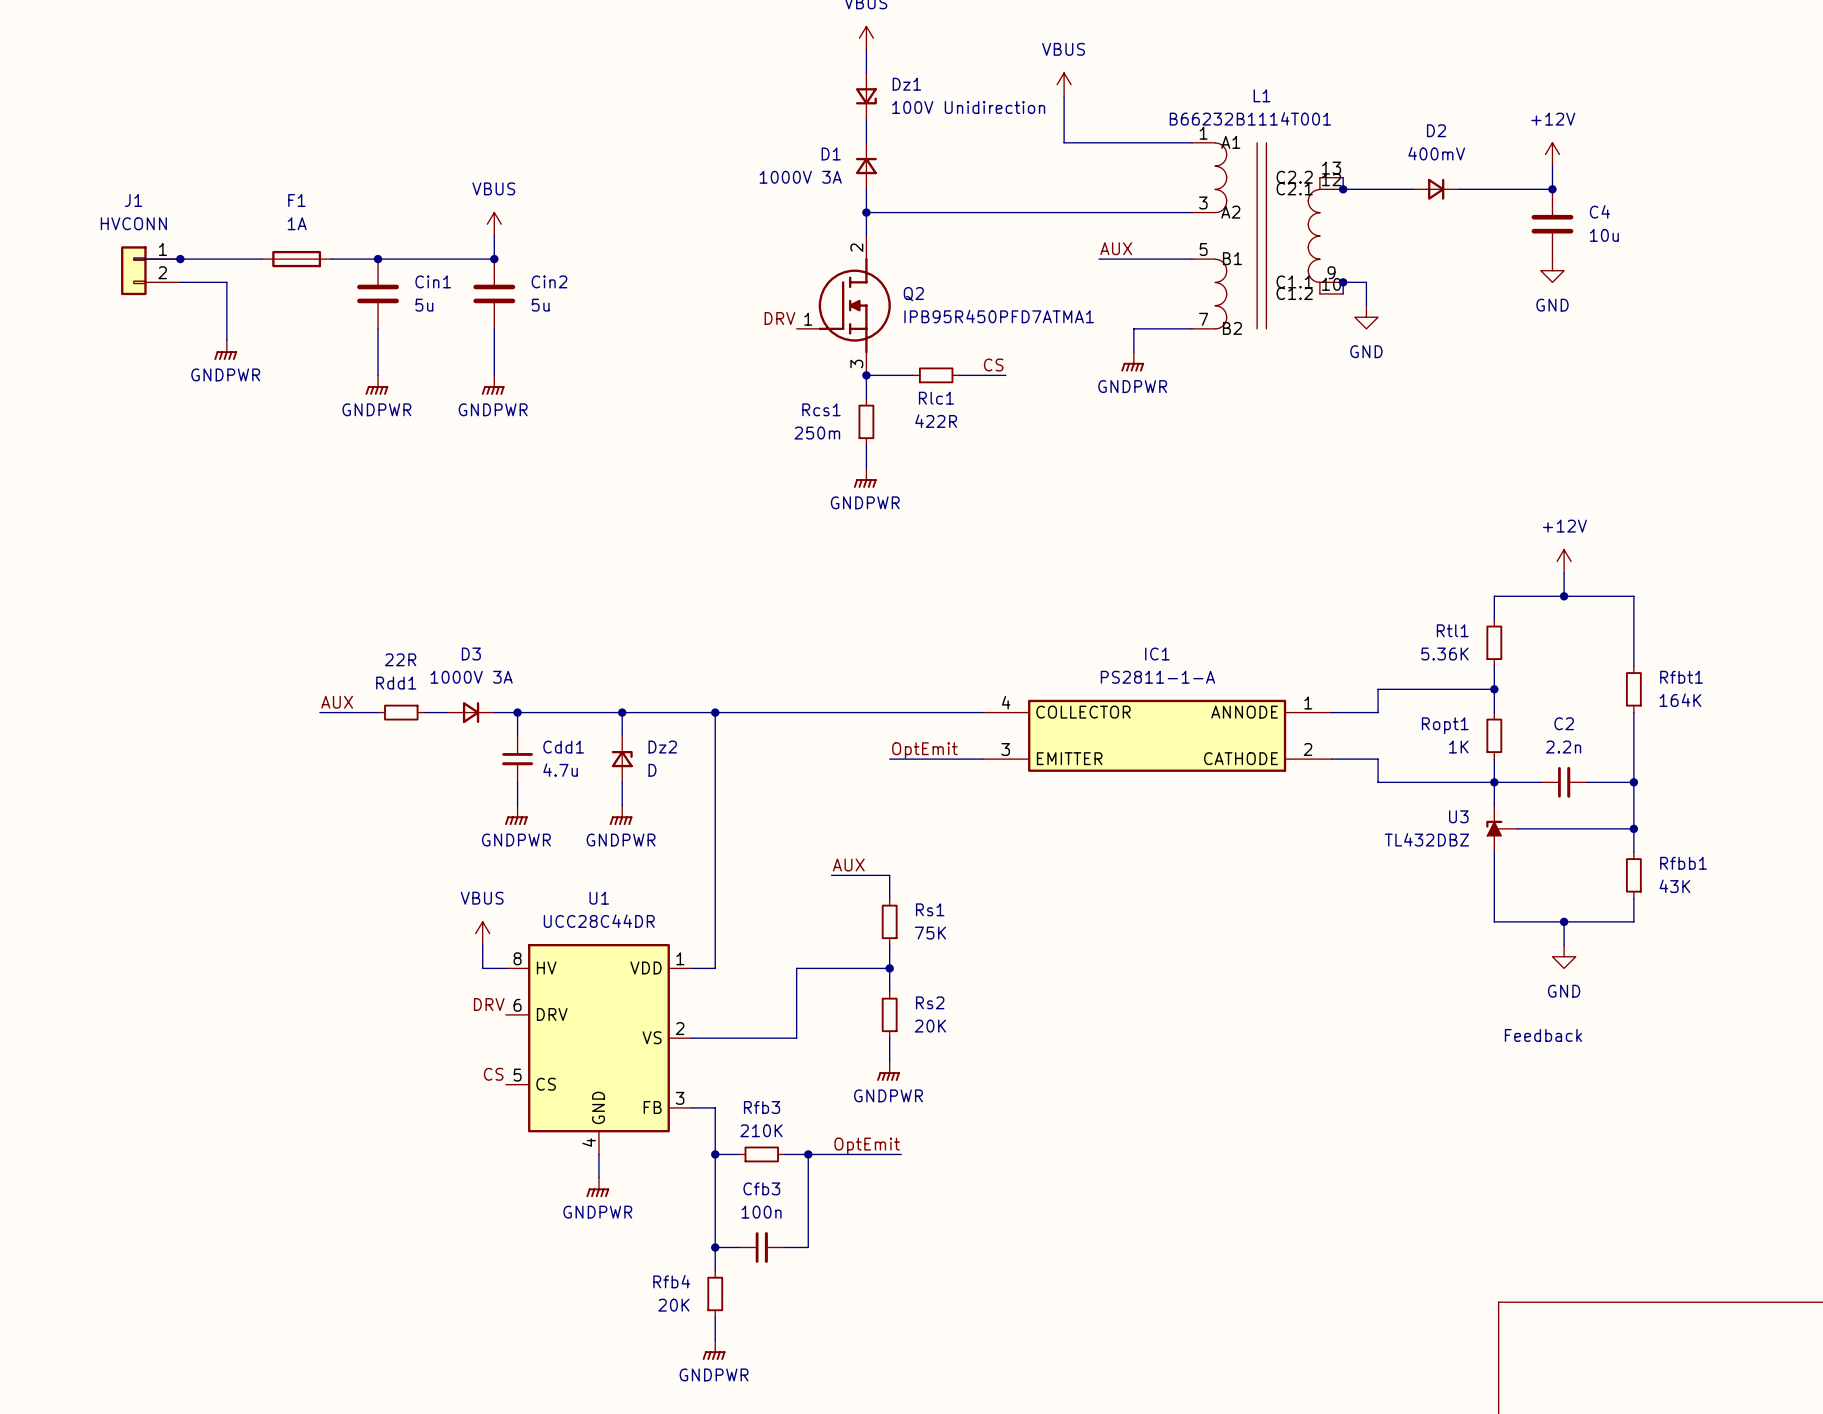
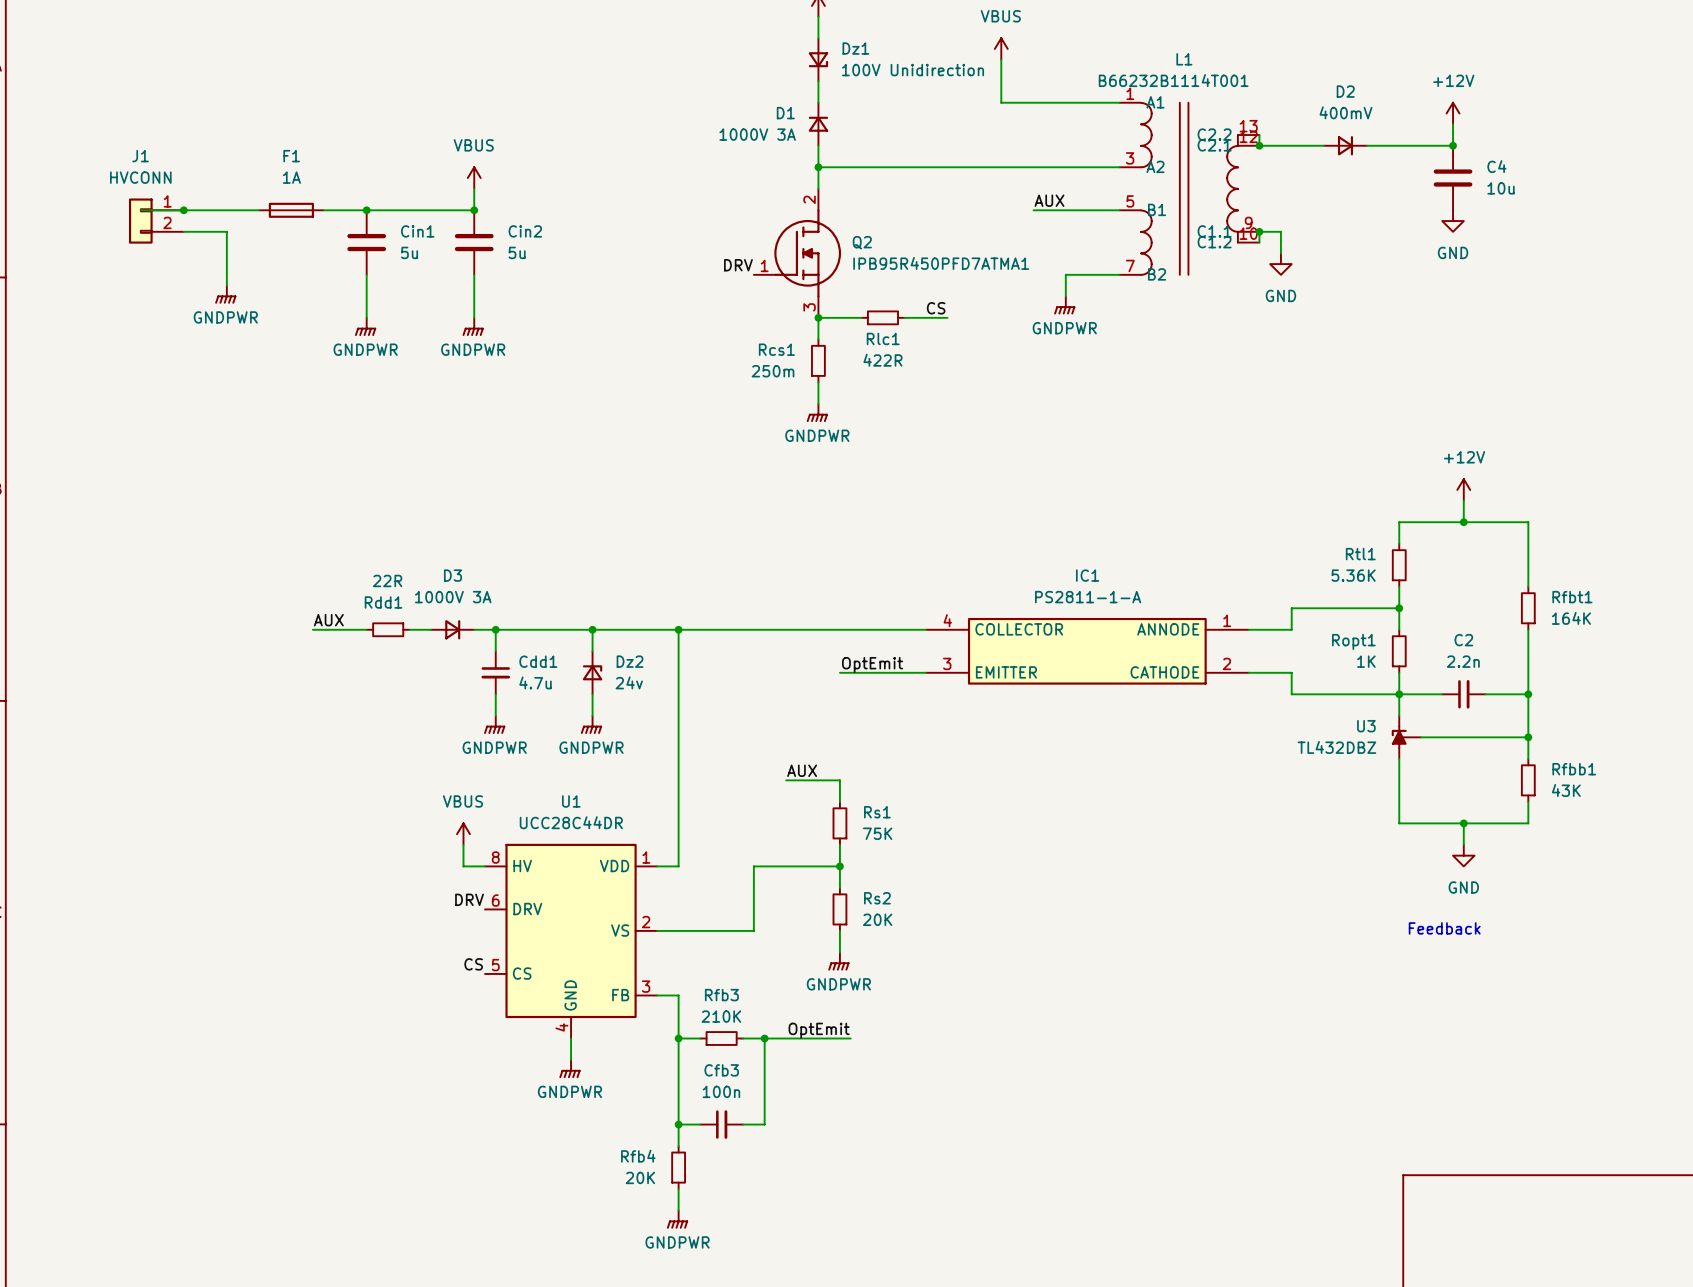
Dz2 value: D (652, 770) -> 24v (629, 682)

